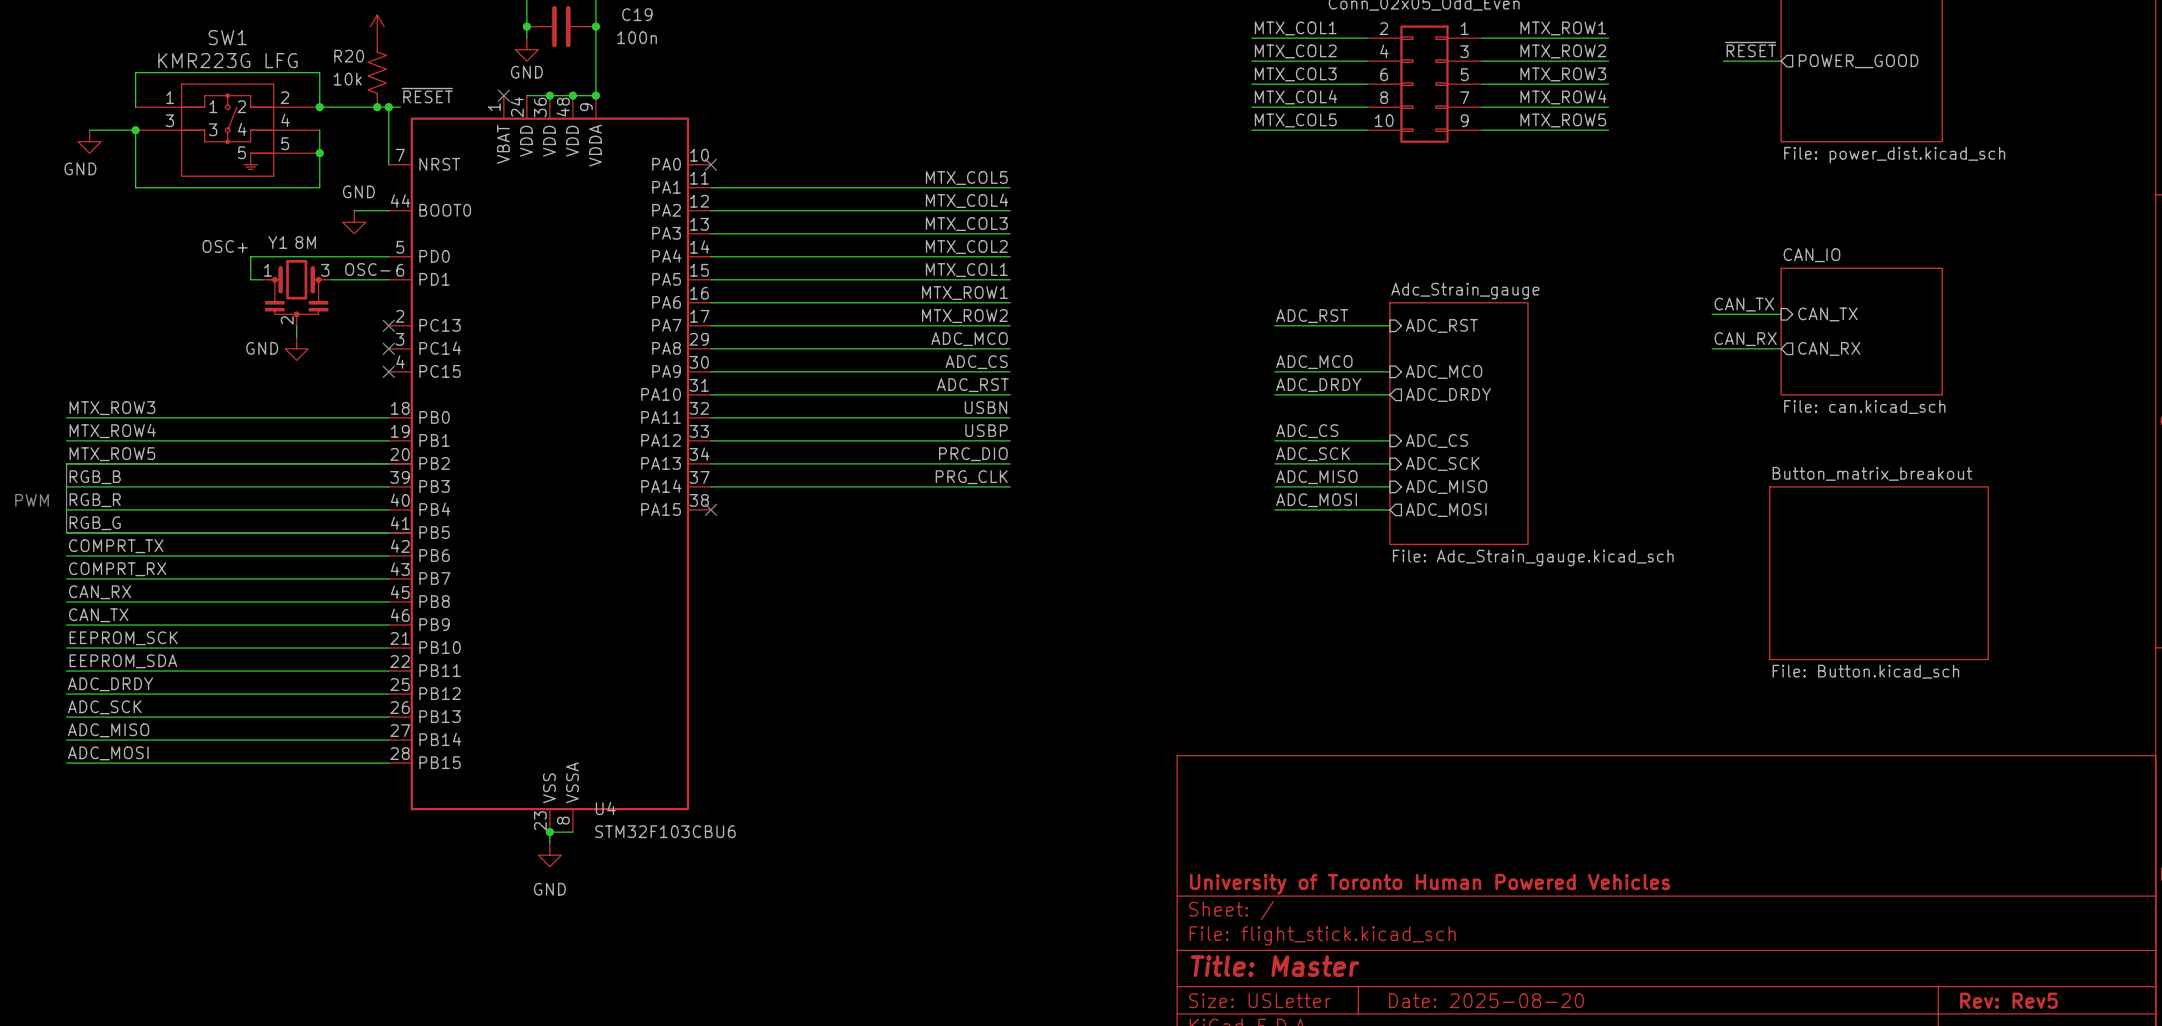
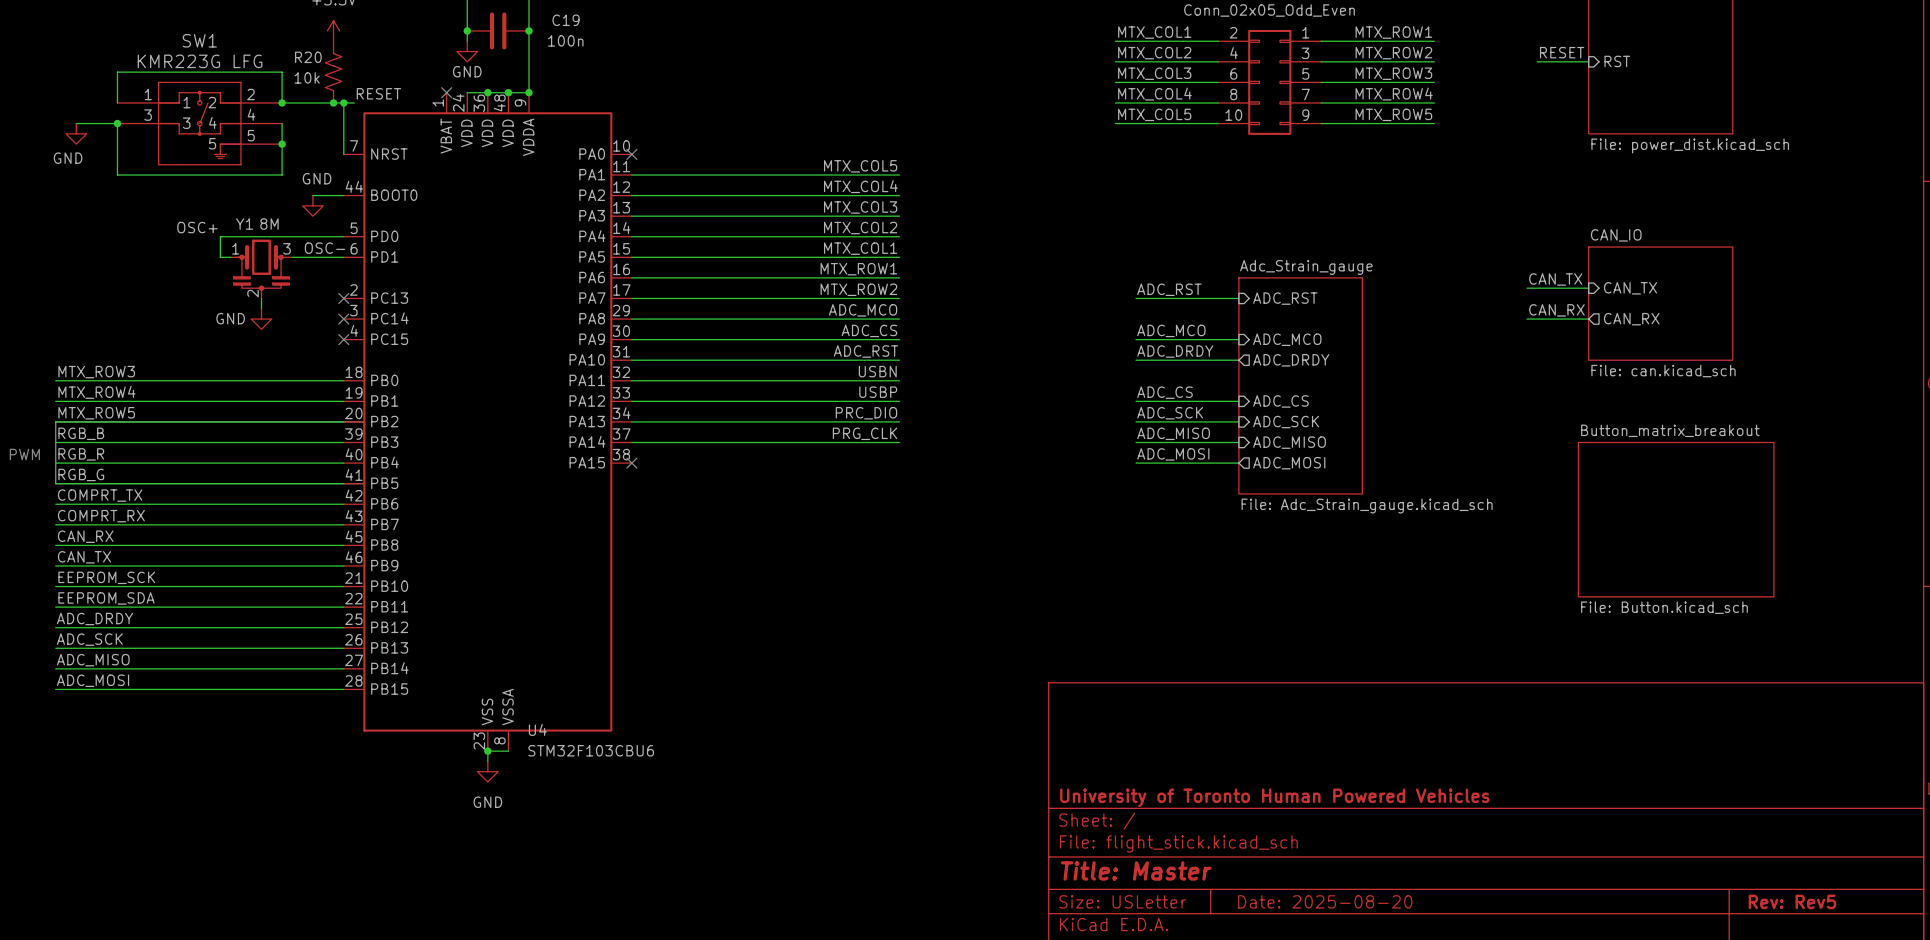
label: ~{RESET} (1750, 49) -> RESET (1562, 52)
sheet pin shape: output (1858, 61) -> input (1617, 61)
sheet pin: POWER__GOOD (1858, 61) -> RST (1617, 61)
label: ~{RESET} (427, 95) -> RESET (378, 93)

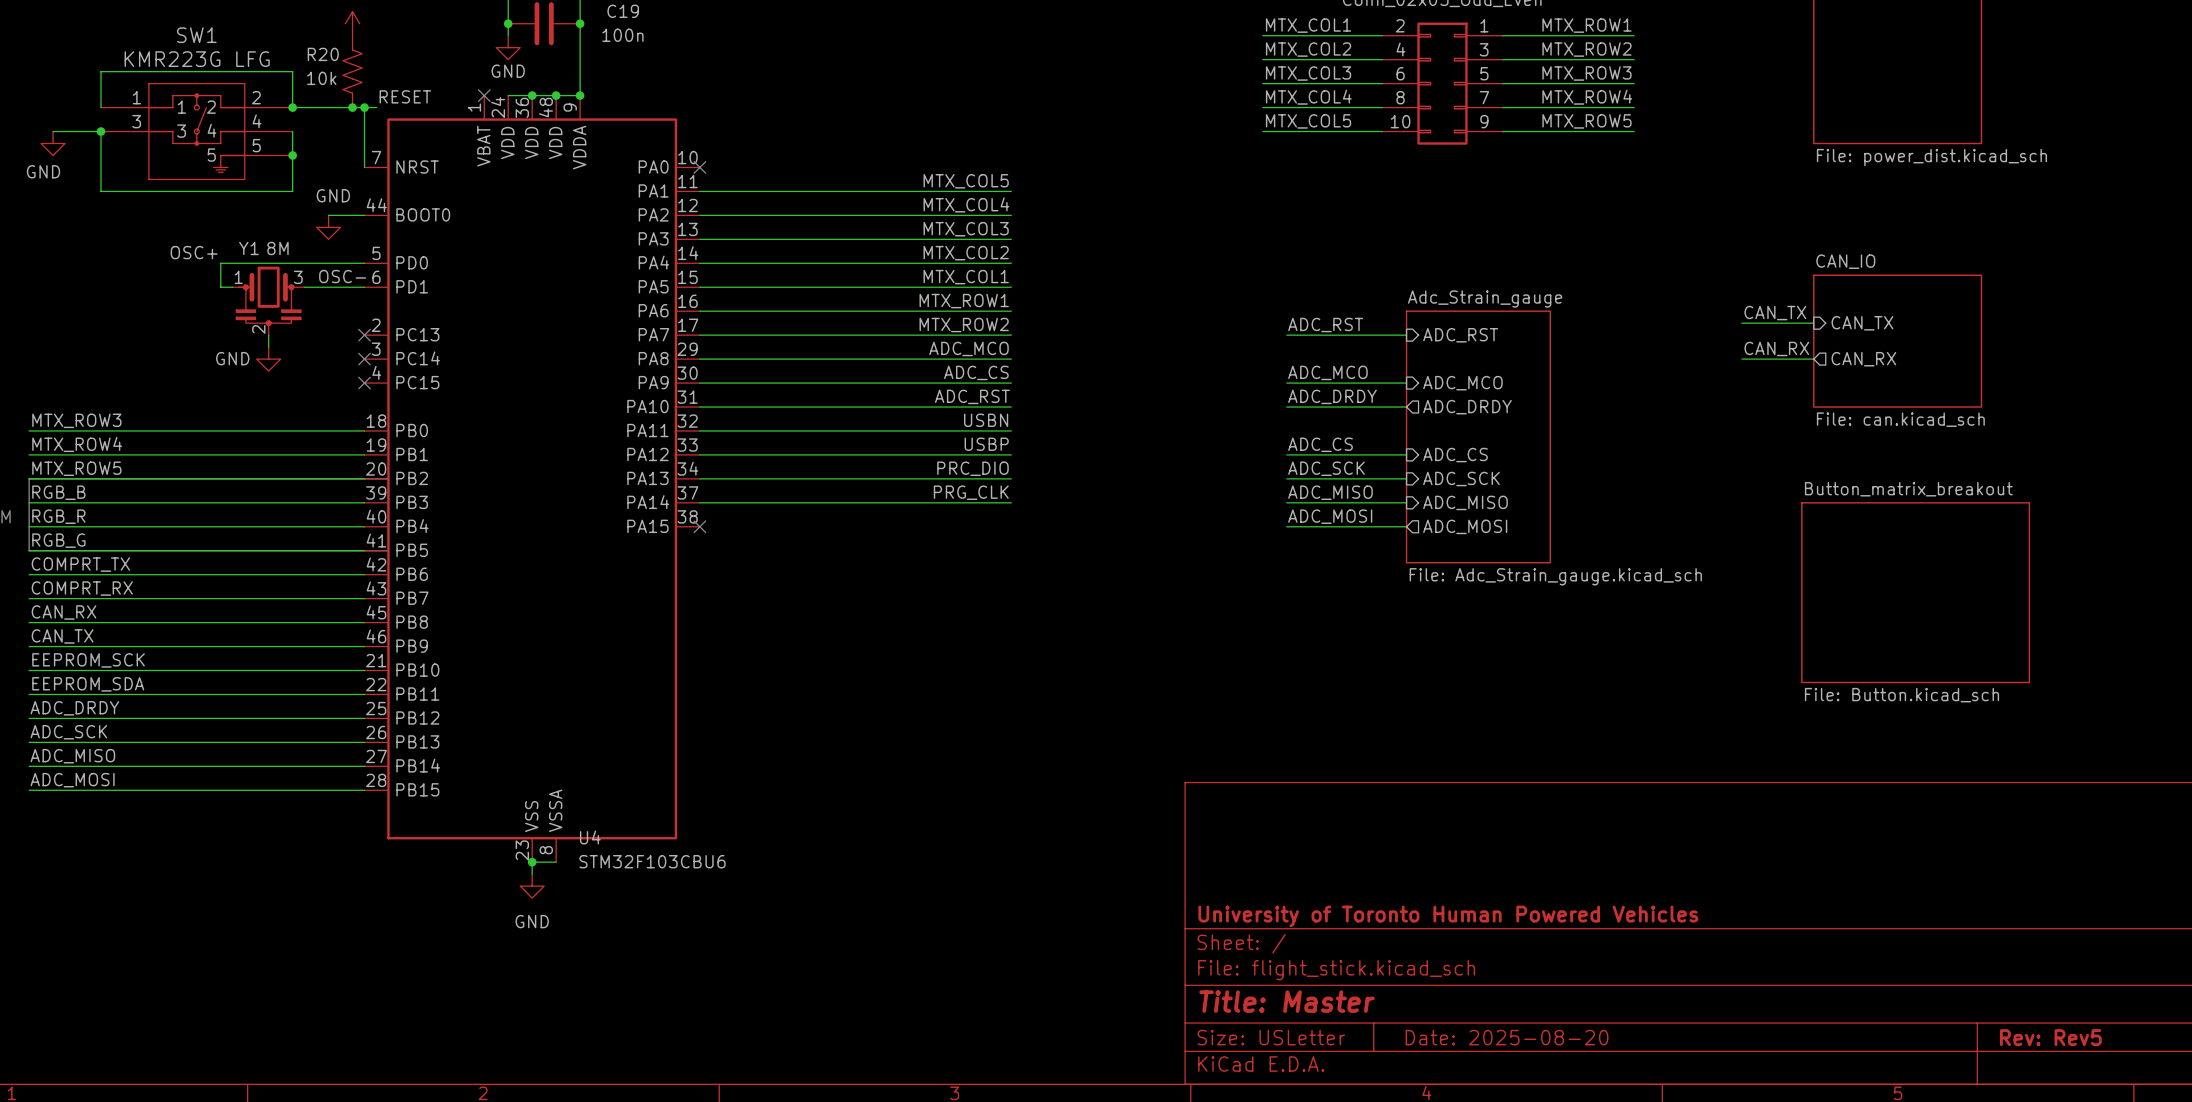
label: RESET (1562, 52) -> none
wire: (1537, 61) (1588, 61) -> none
sheet pin: RST (1617, 61) -> none

